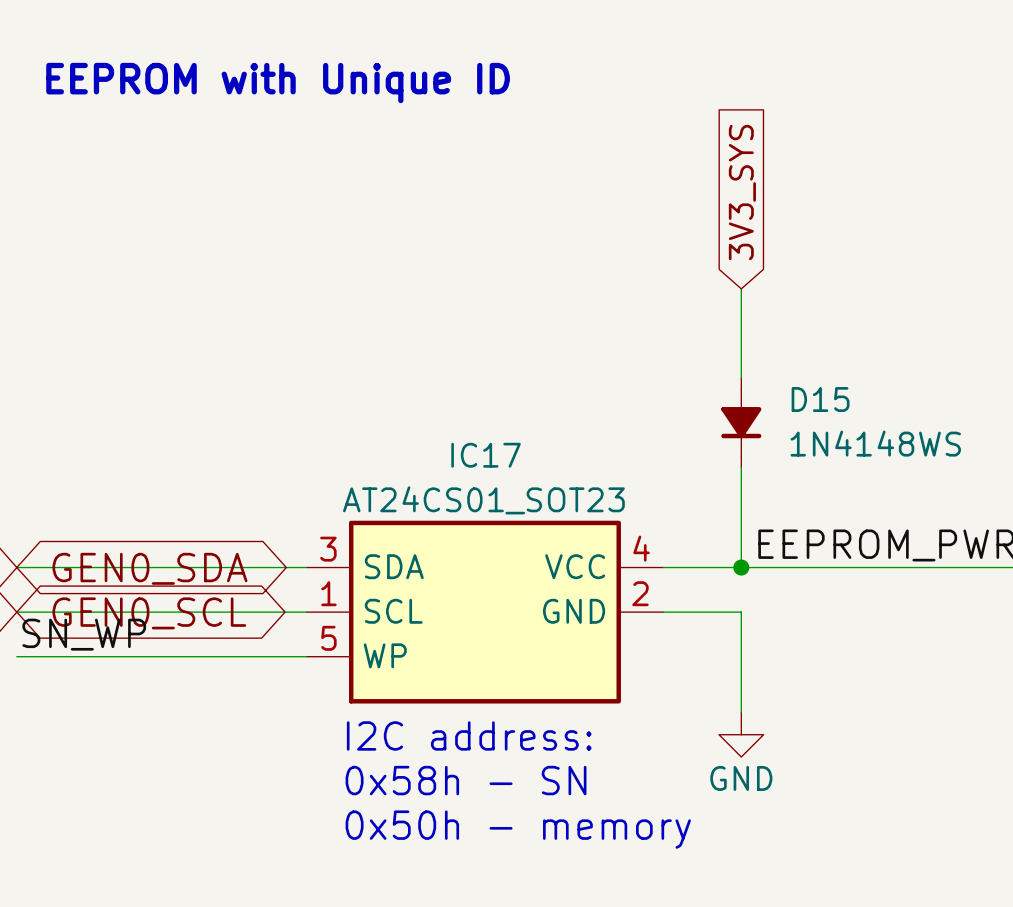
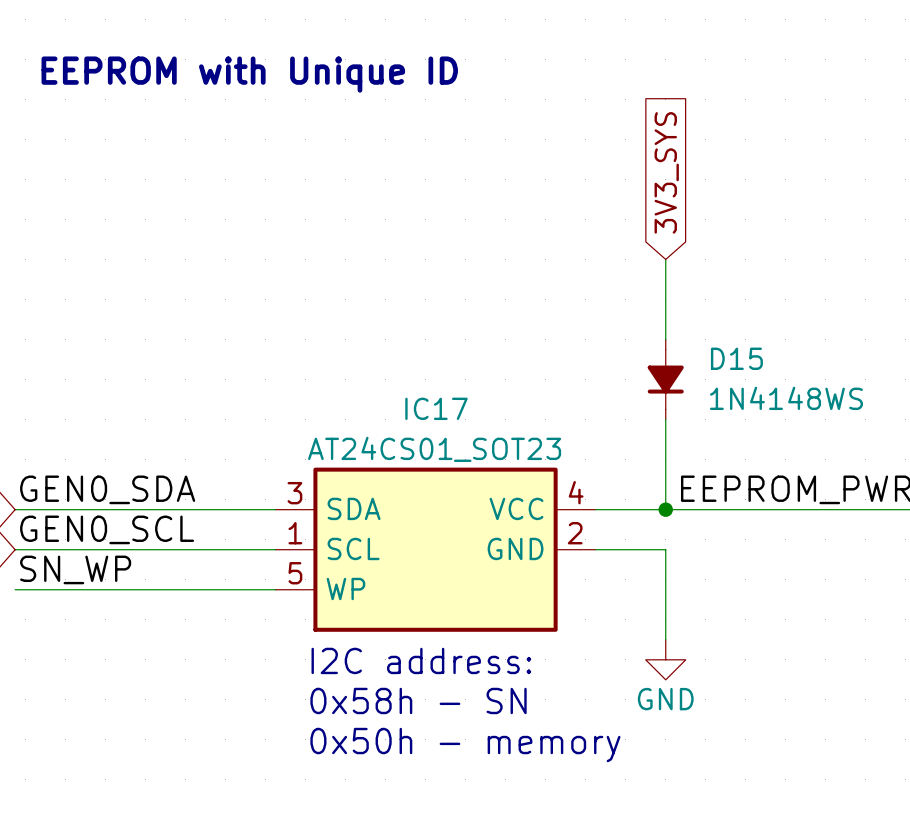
label: none -> GEN0_SDA (107, 489)
global label: GEN0_SDA (149, 568) -> none
label: none -> GEN0_SCL (107, 529)
global label: GEN0_SCL (149, 613) -> none

